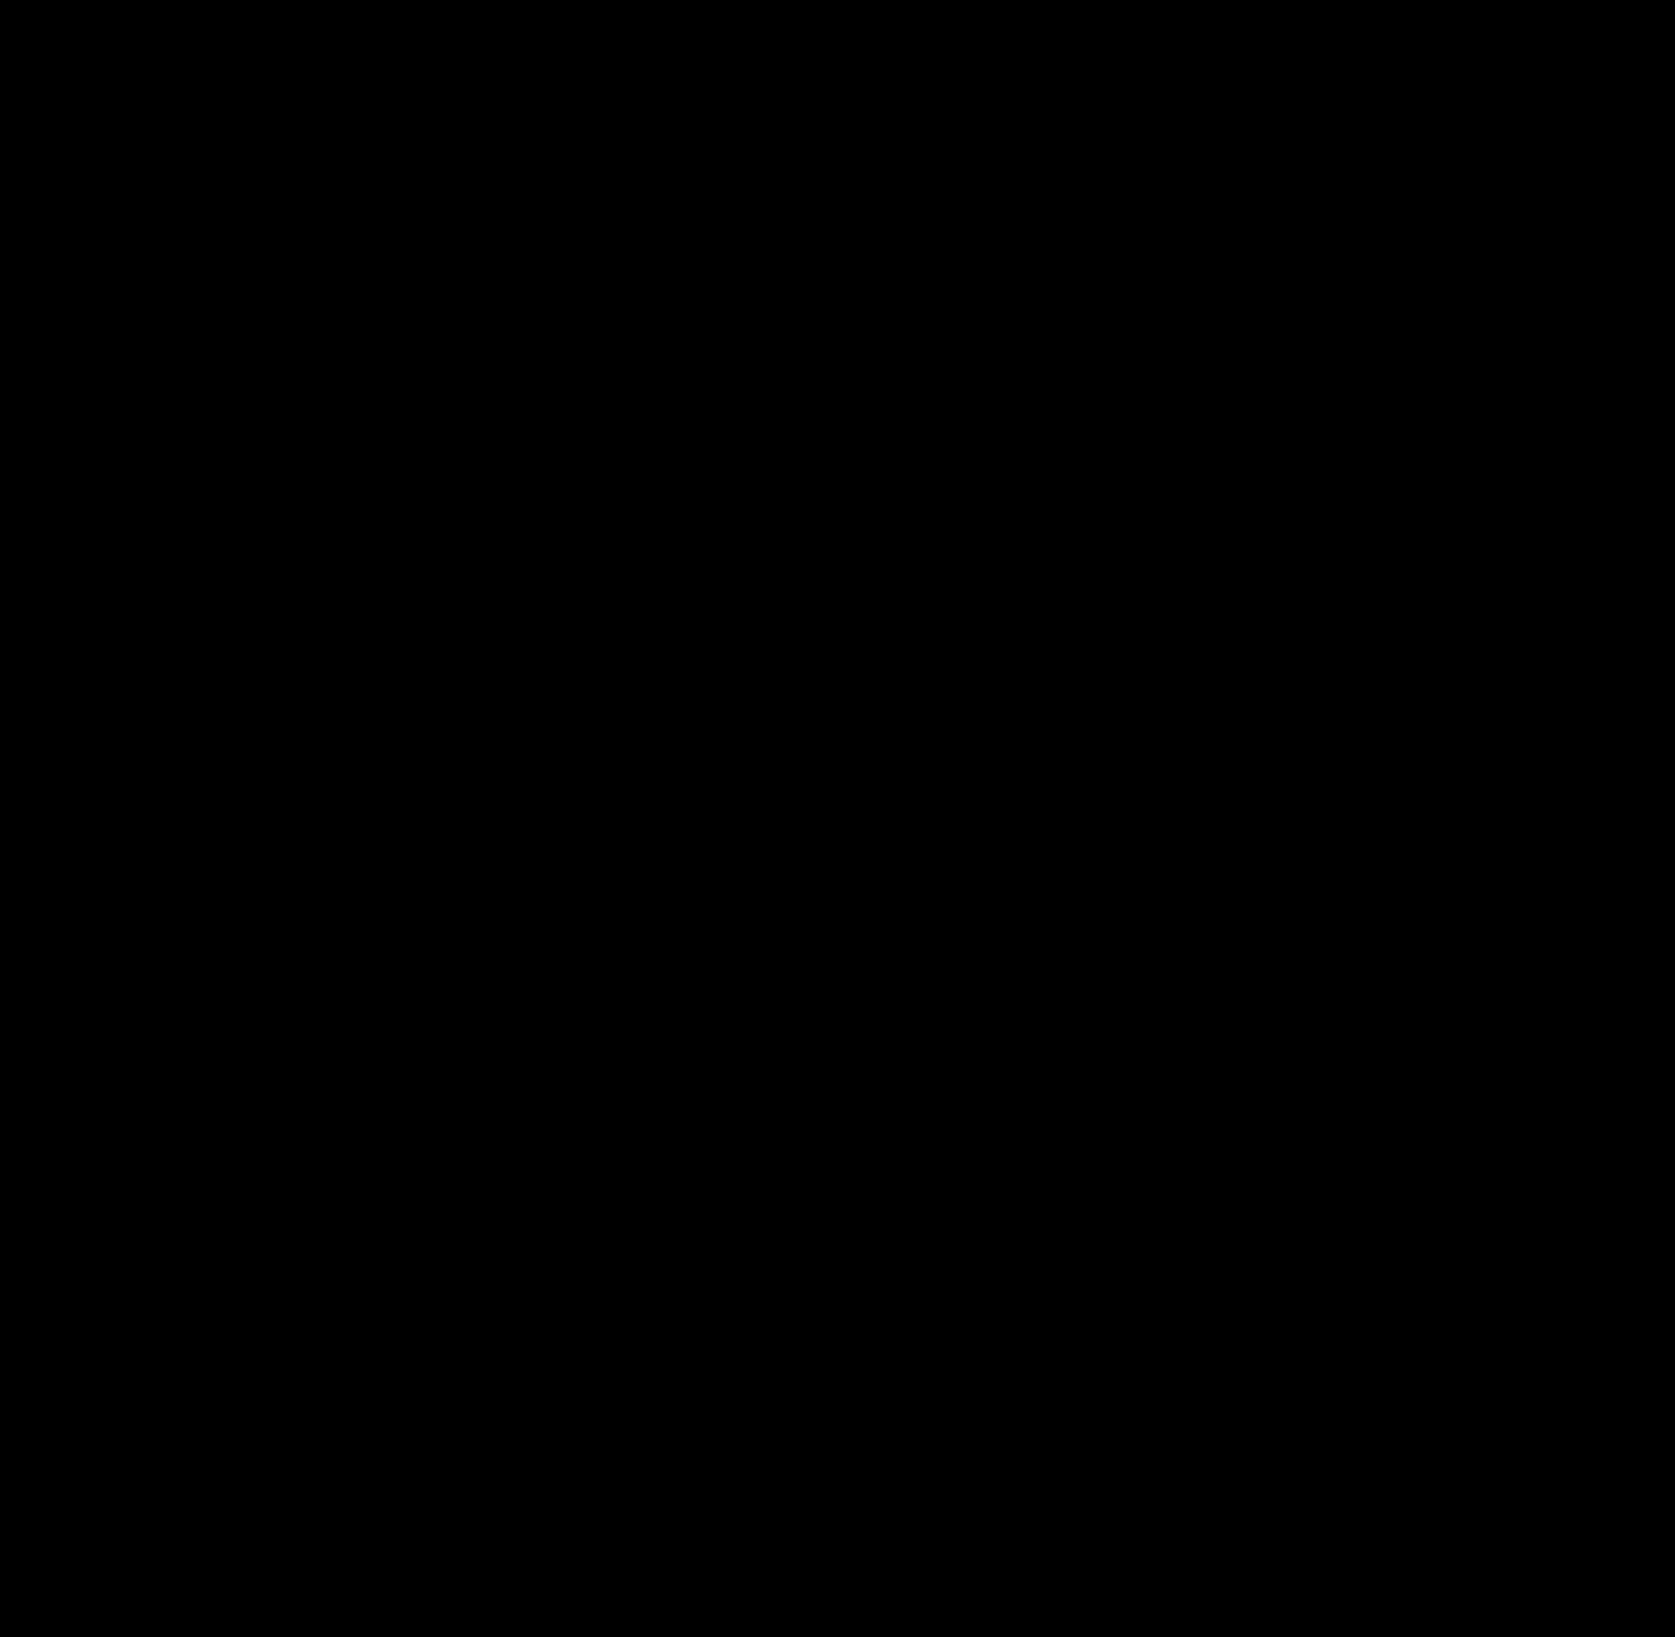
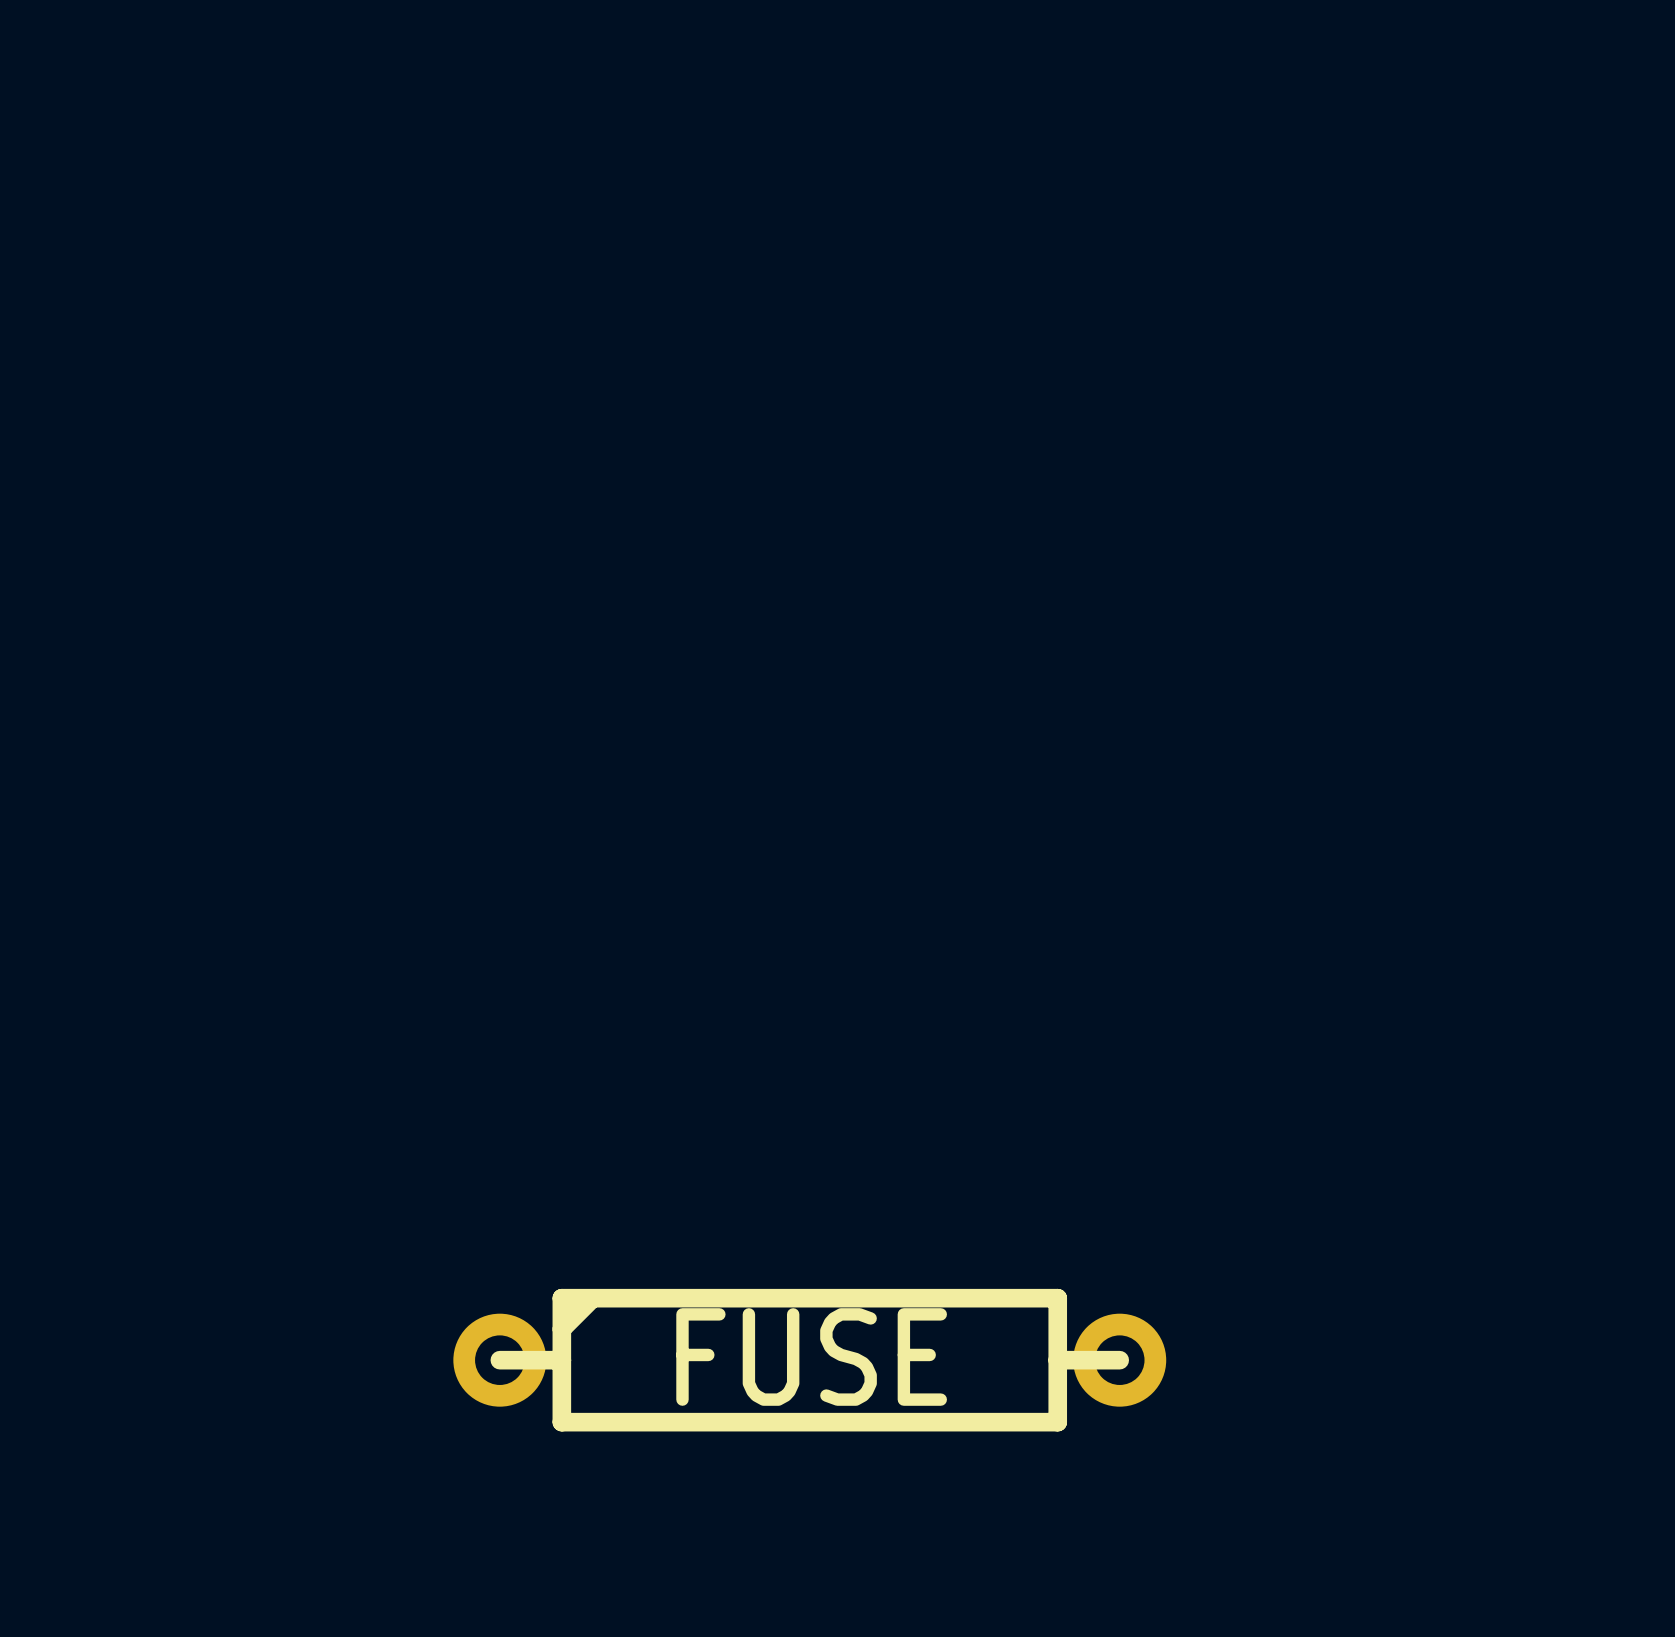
part: none -> FUSE (809, 1360)

